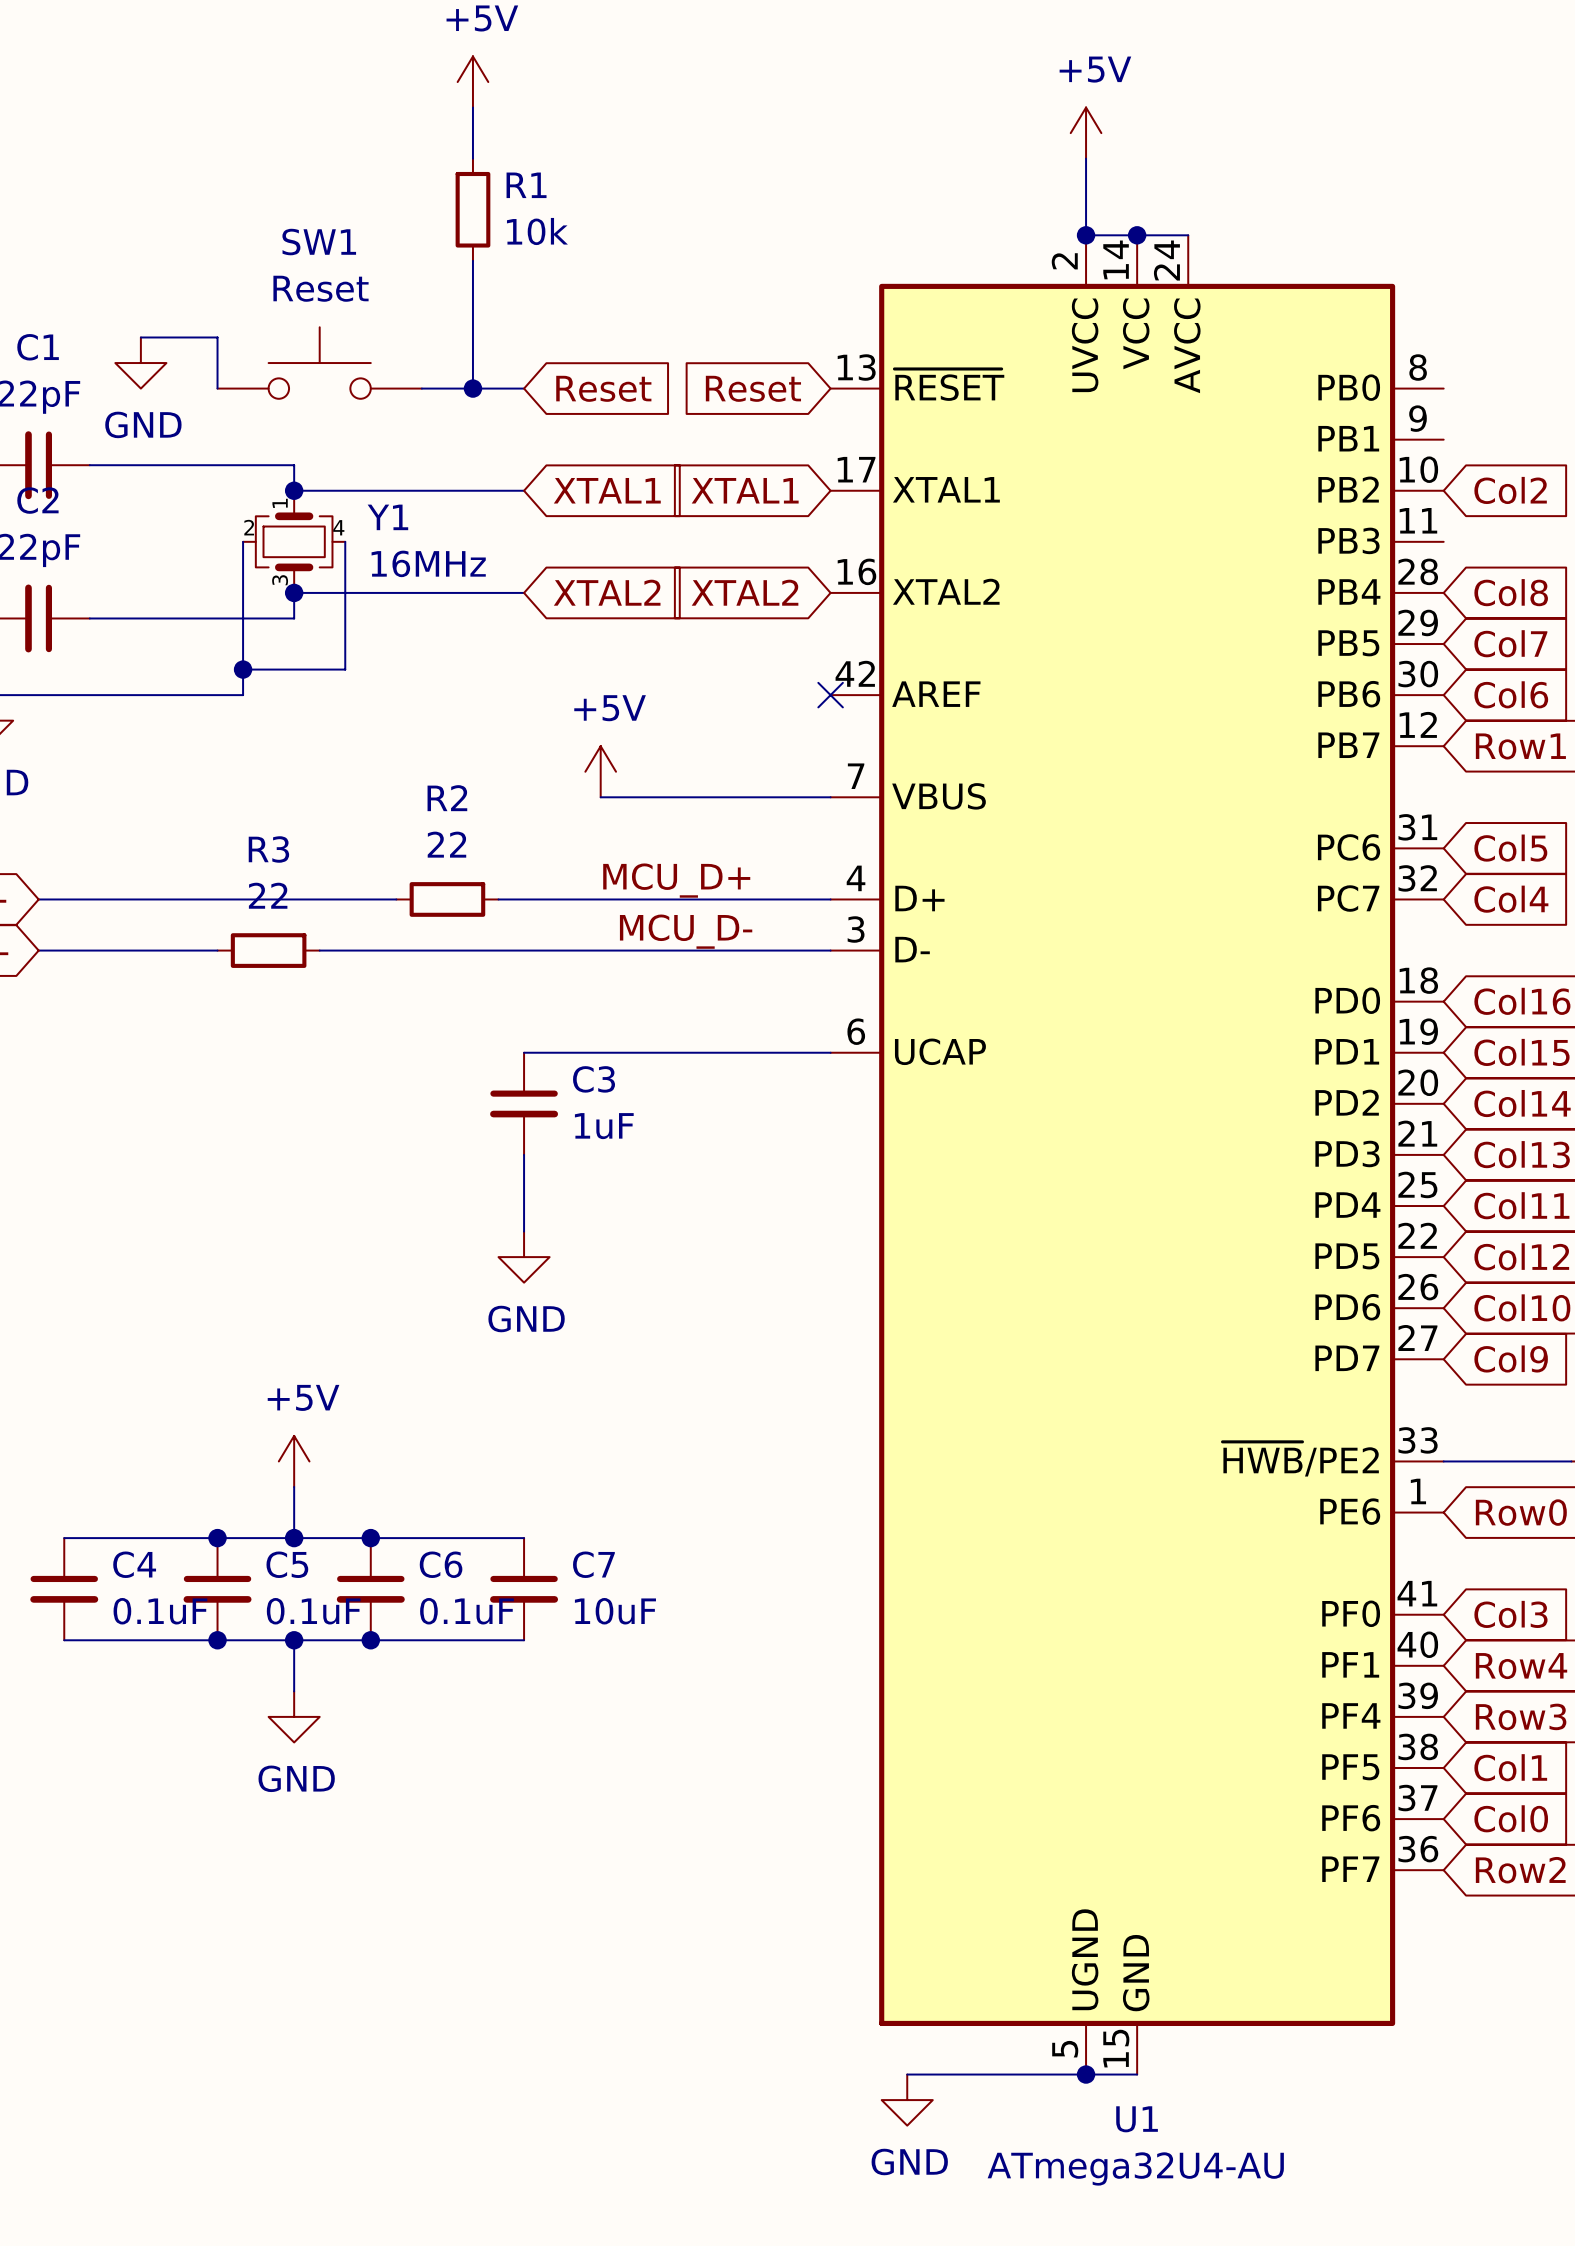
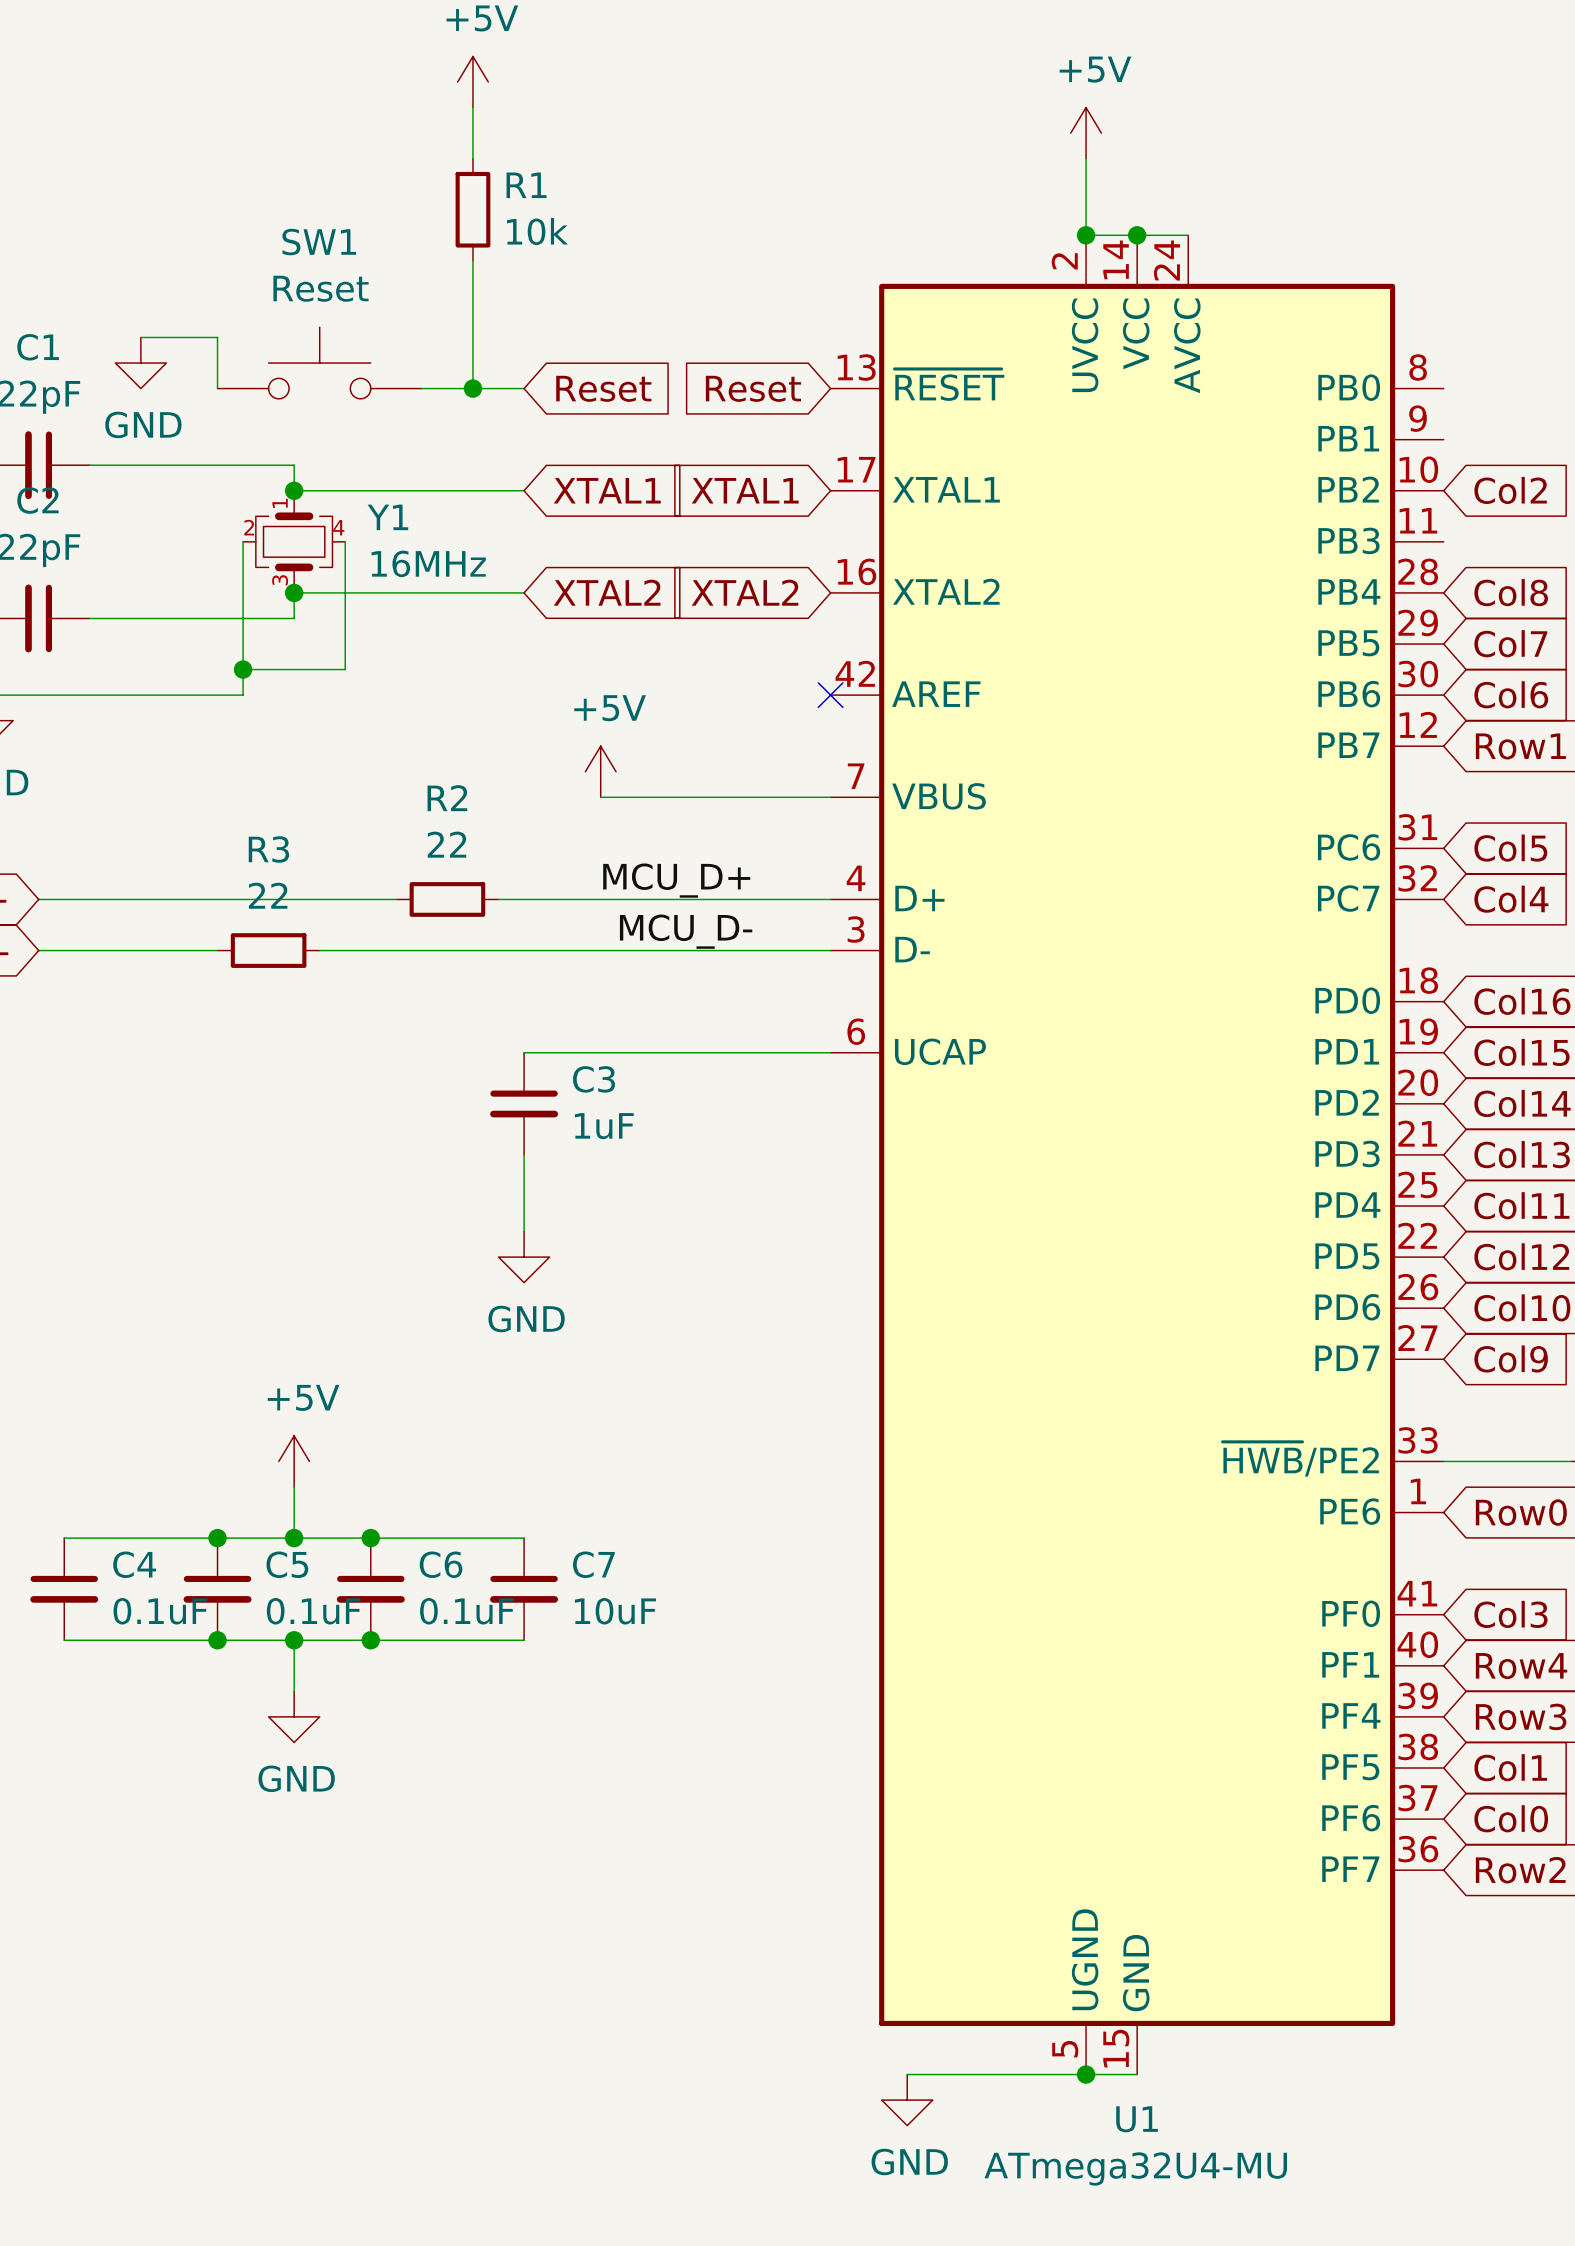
U1 value: ATmega32U4-AU (1135, 2168) -> ATmega32U4-MU (1135, 2168)

